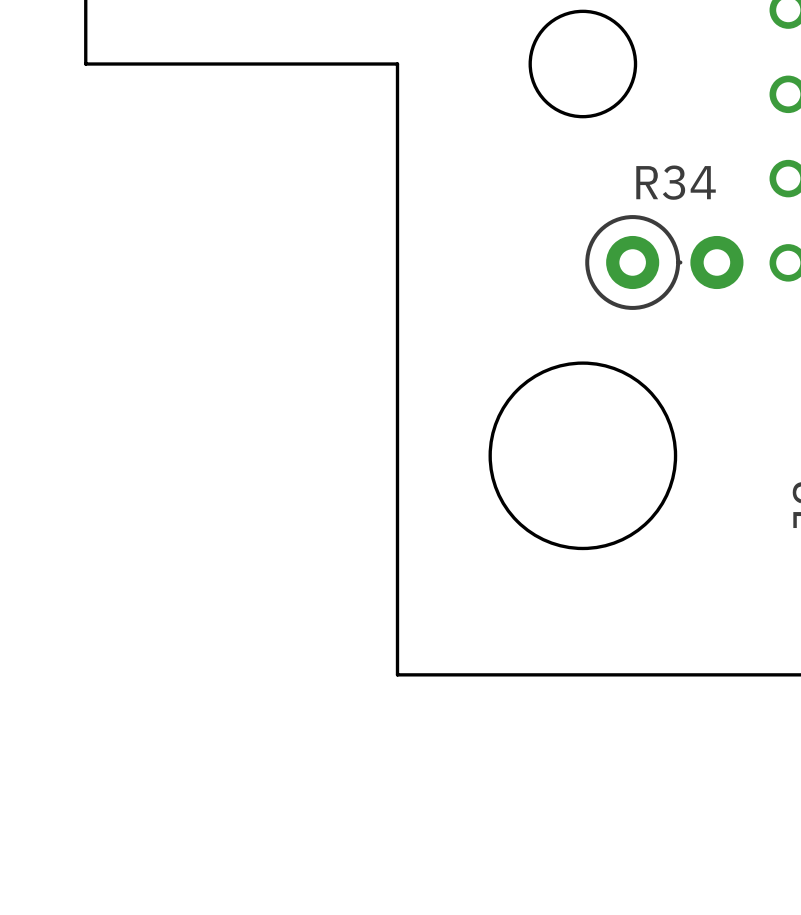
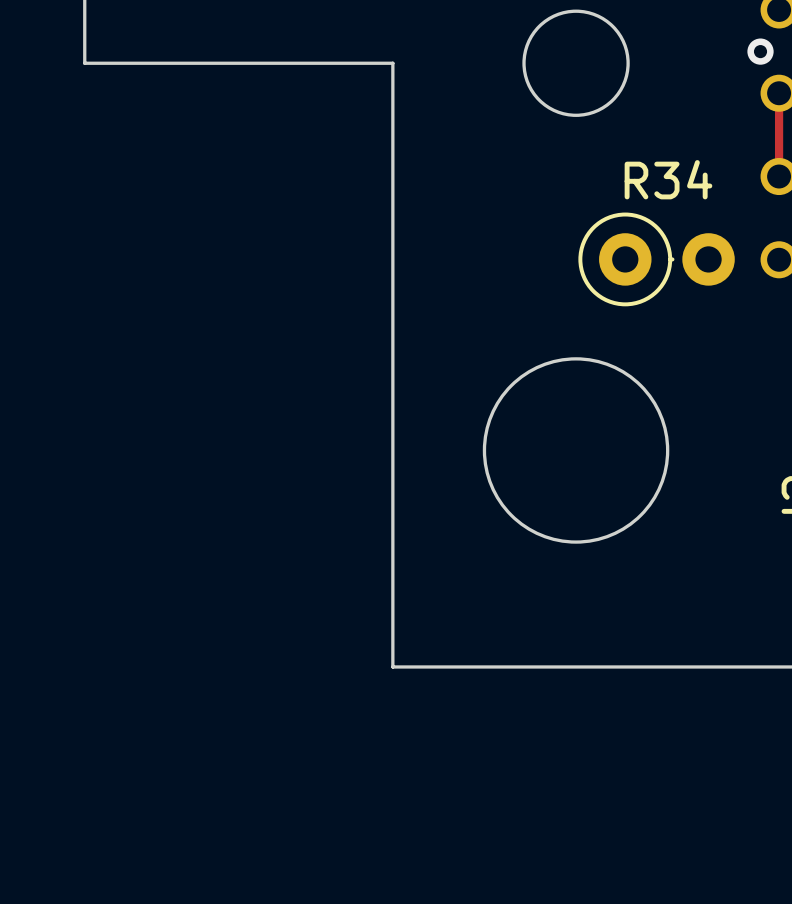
via: none -> (760, 51)
track: none -> (779, 93) (779, 176)

